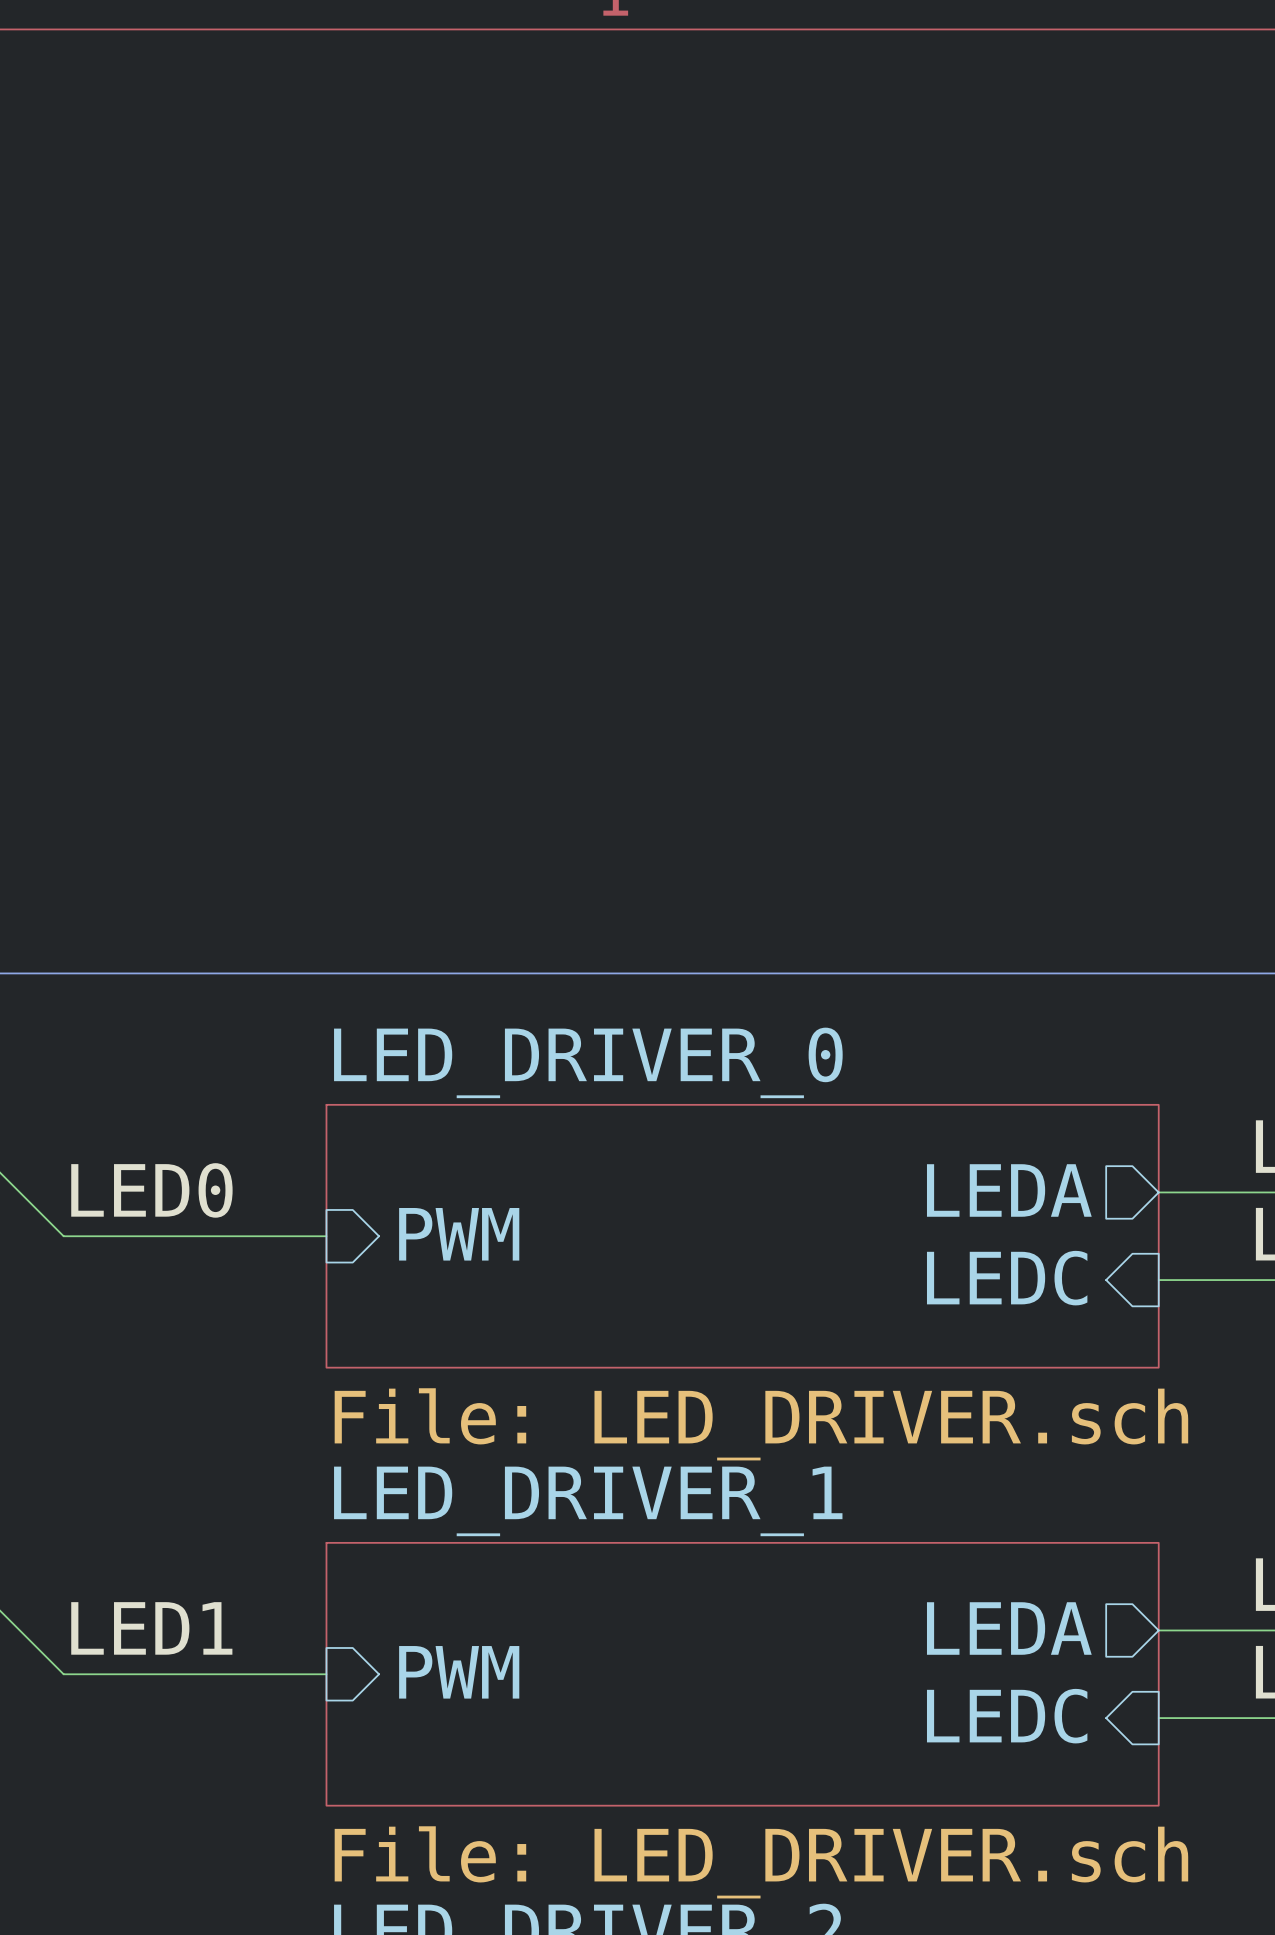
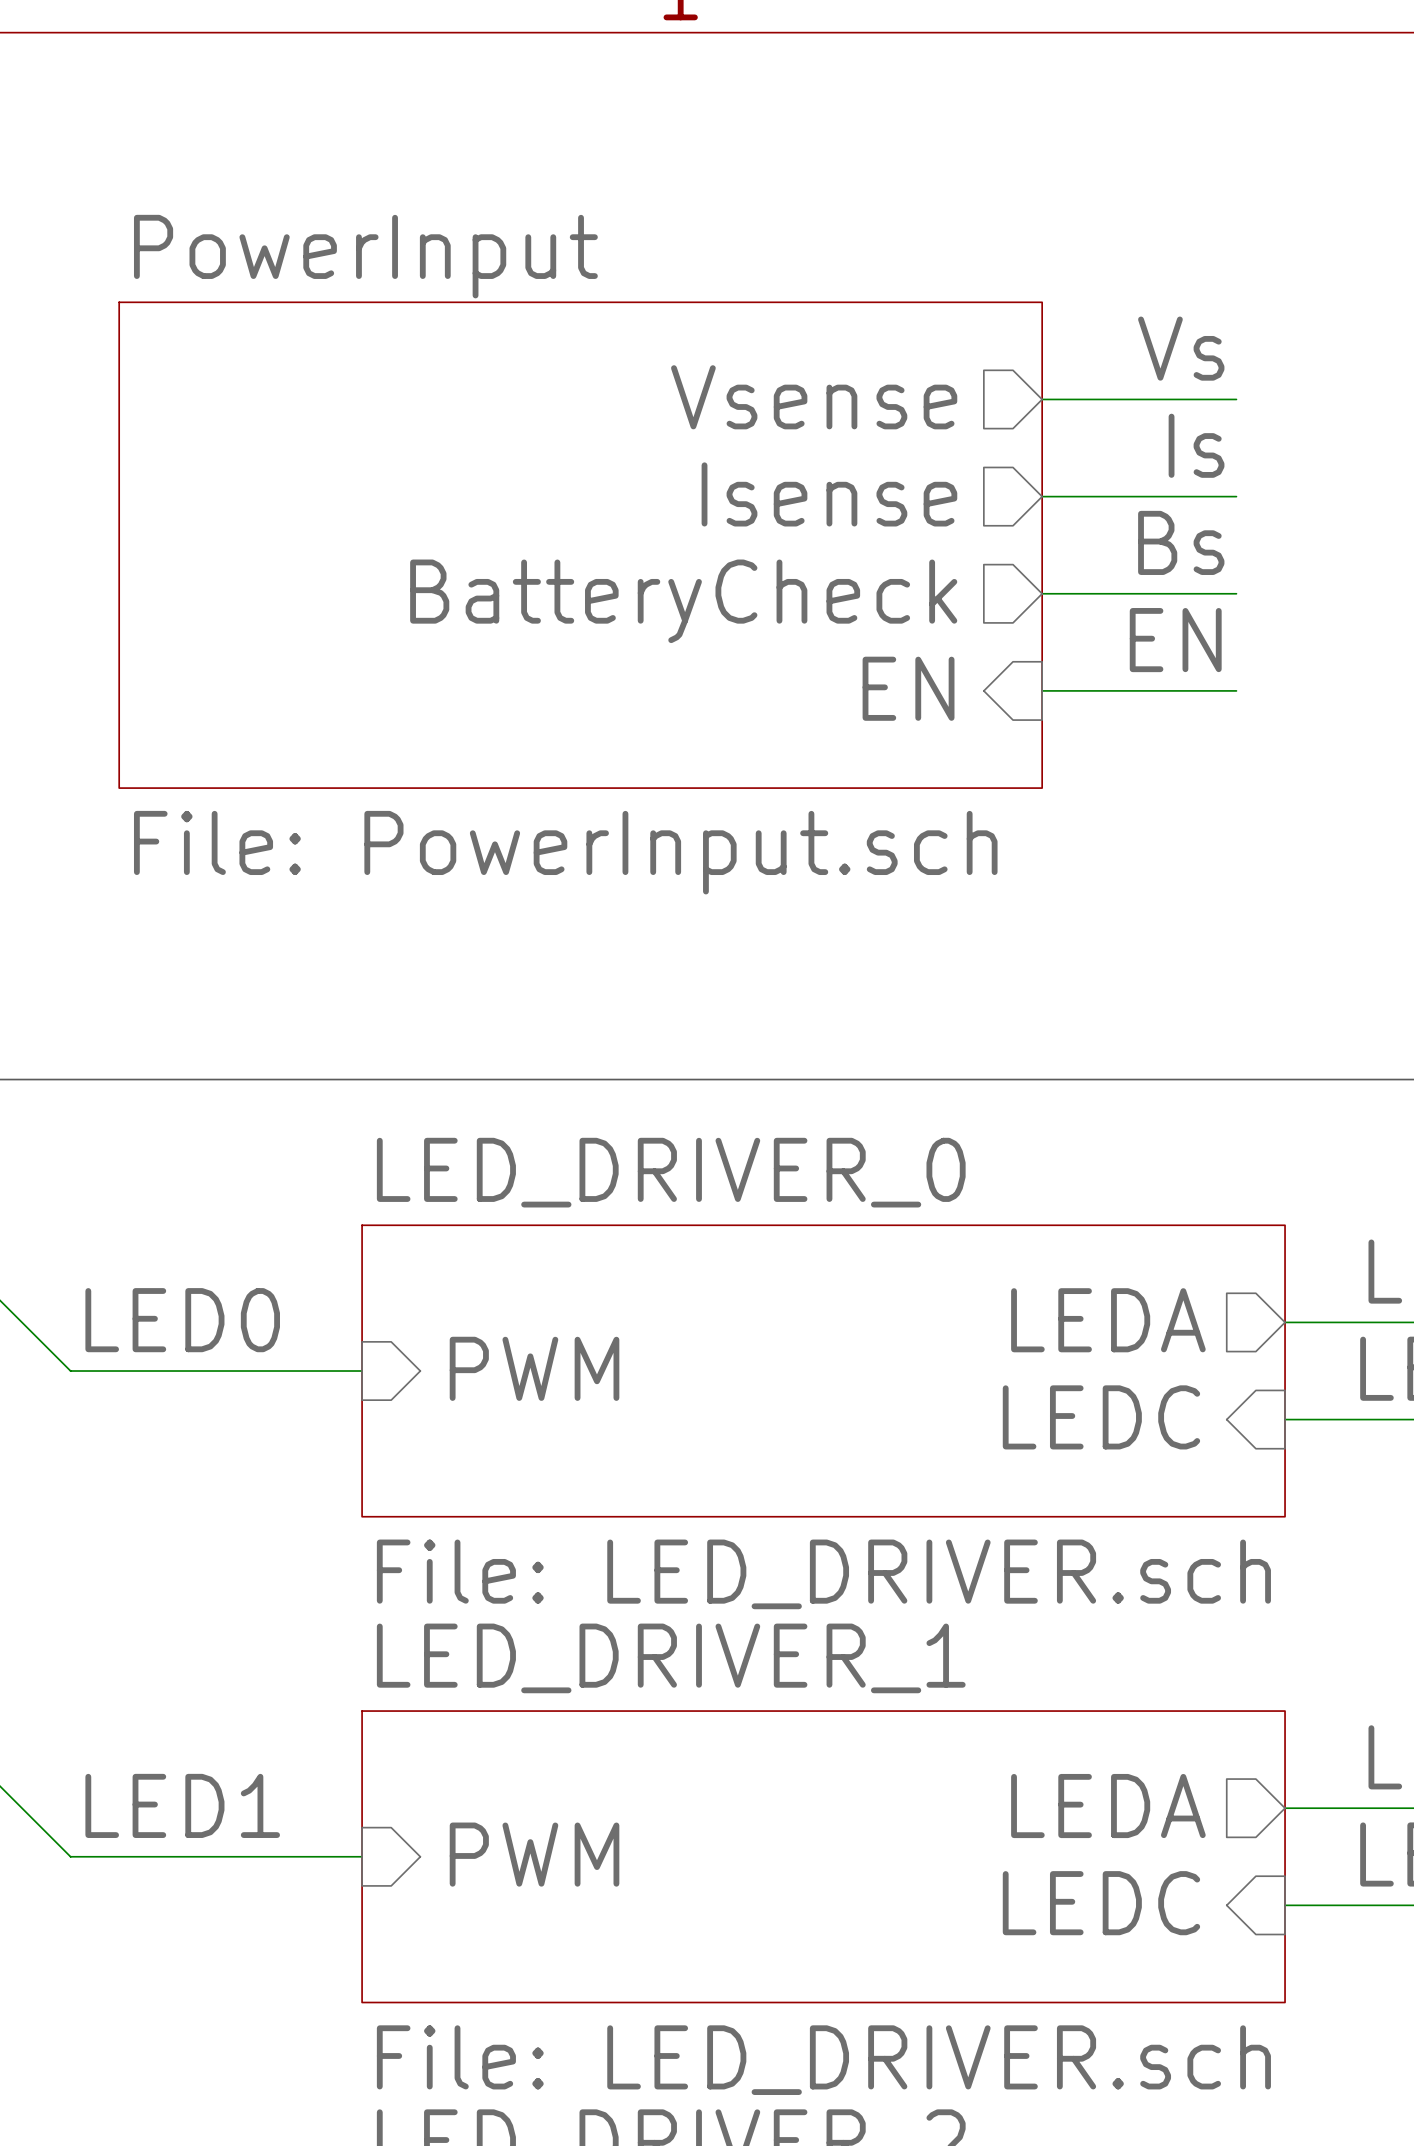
label: none -> Vs (1181, 348)
sheet pin: none -> Vsense (814, 397)
wire: none -> (1042, 399) (1236, 399)
label: none -> Is (1196, 445)
sheet pin: none -> Isense (829, 494)
wire: none -> (1042, 496) (1236, 496)
label: none -> Bs (1181, 542)
sheet PowerInput: none -> File: PowerInput.sch (580, 545)
wire: none -> (1042, 593) (1236, 593)
sheet pin: none -> BatteryCheck (683, 601)
label: none -> EN (1175, 640)
sheet pin: none -> EN (908, 688)
wire: none -> (1042, 690) (1236, 690)

